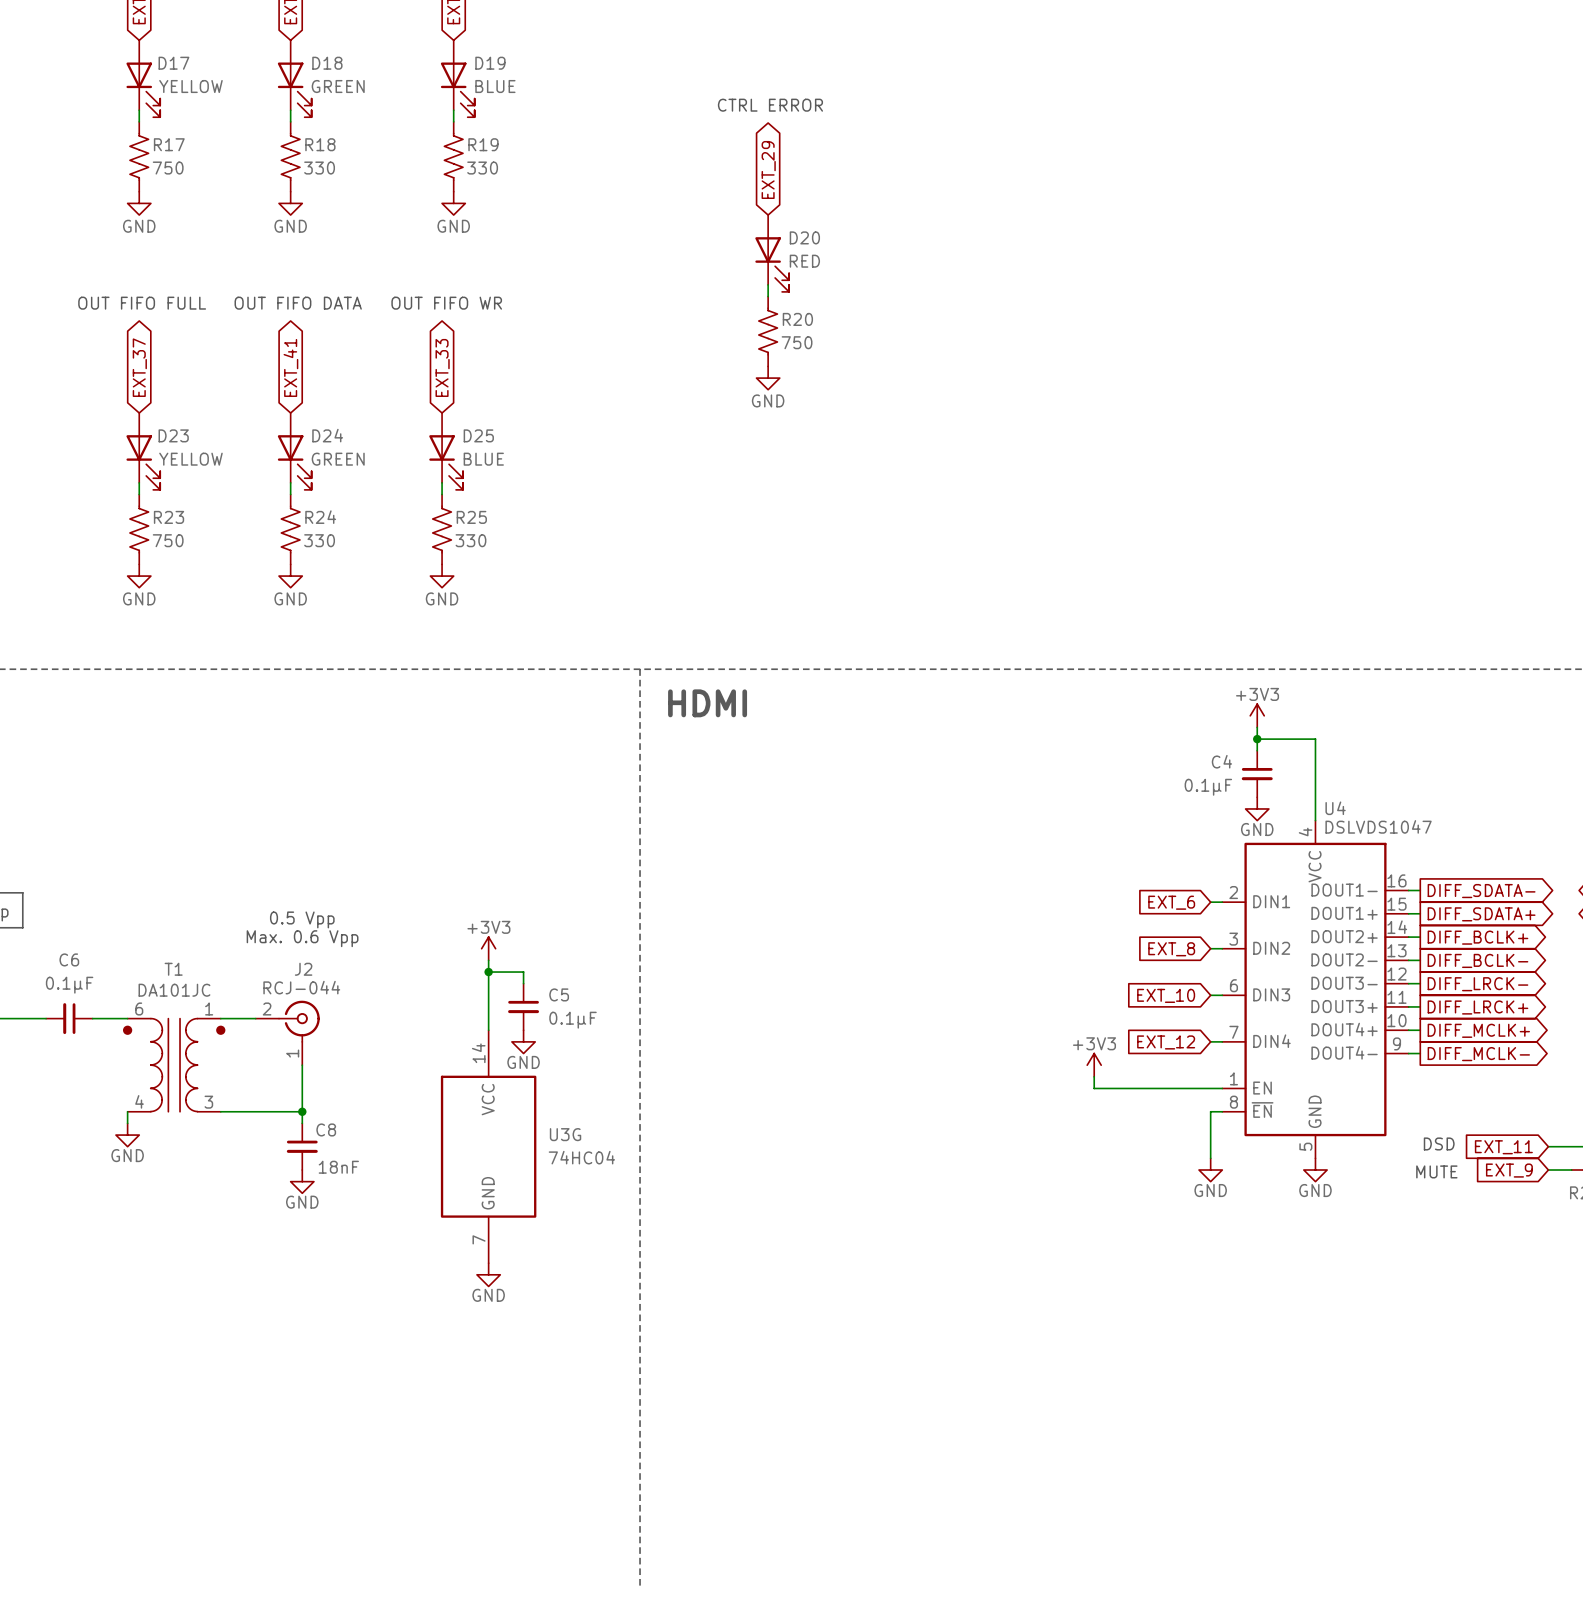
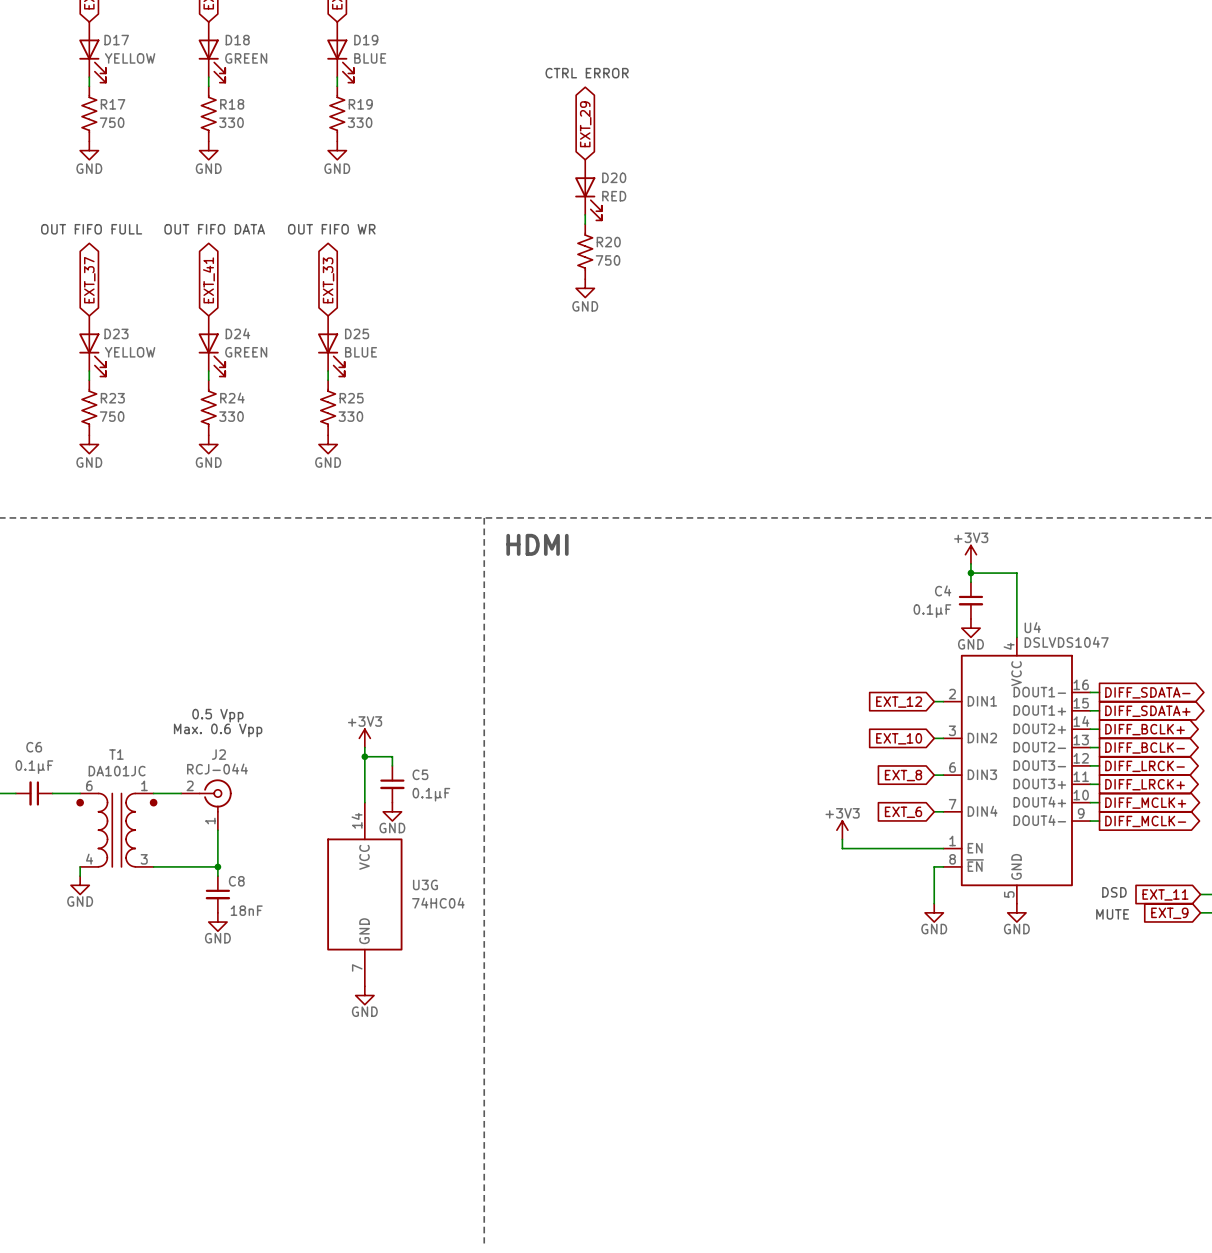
global label: EXT_6 (1171, 902) -> EXT_12 (899, 702)
global label: EXT_8 (1171, 949) -> EXT_10 (899, 738)
global label: EXT_10 (1166, 995) -> EXT_8 (903, 775)
global label: EXT_12 (1166, 1042) -> EXT_6 (903, 812)

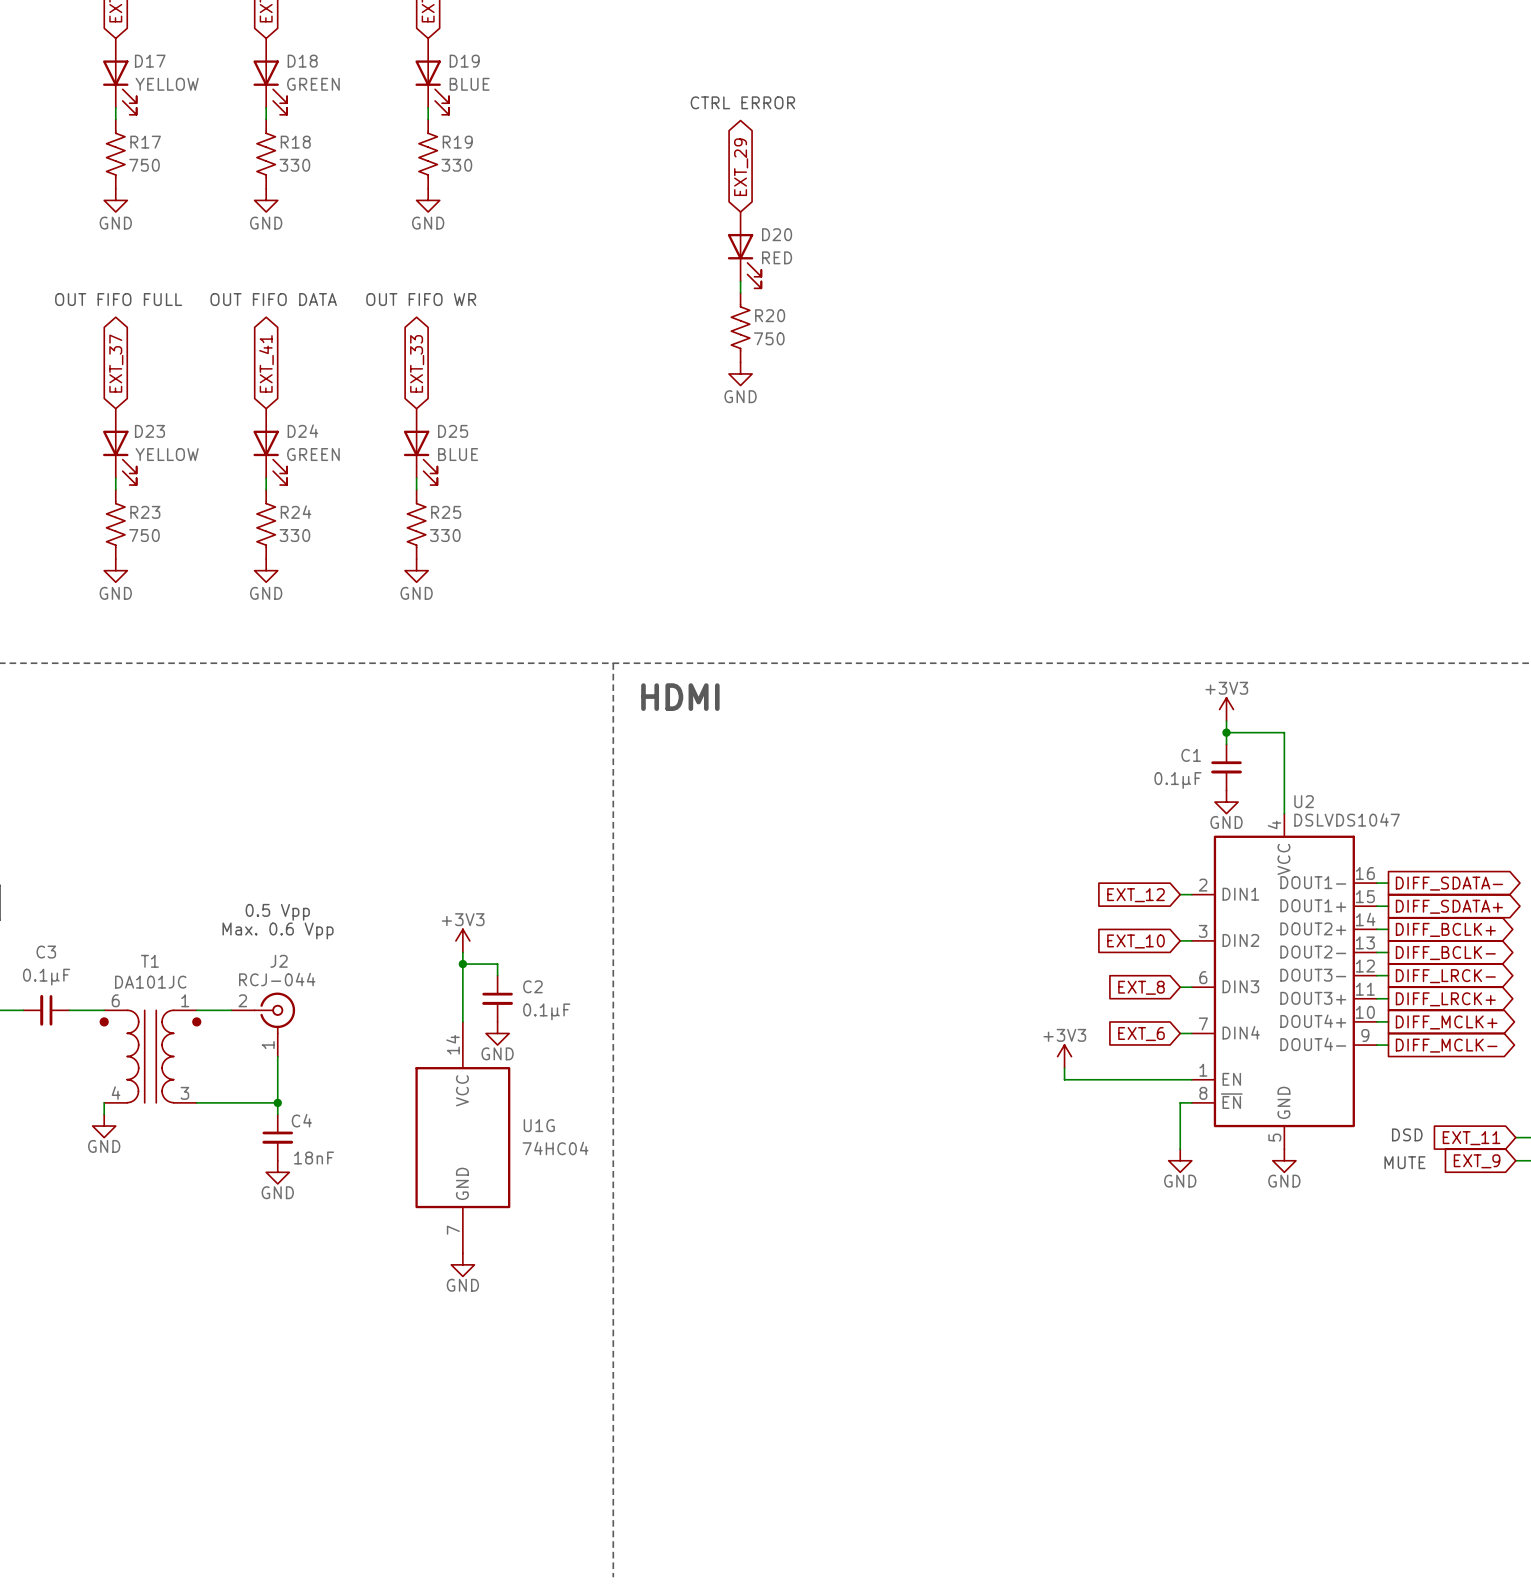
C4 name: C4 (943, 590) -> C1 (1191, 755)
U4 name: U4 (1032, 627) -> U2 (1304, 801)
C6 name: C6 (34, 747) -> C3 (46, 952)
C5 name: C5 (420, 774) -> C2 (532, 986)
C8 name: C8 (236, 881) -> C4 (301, 1120)
U3G name: U3G (425, 884) -> U1G (539, 1125)

